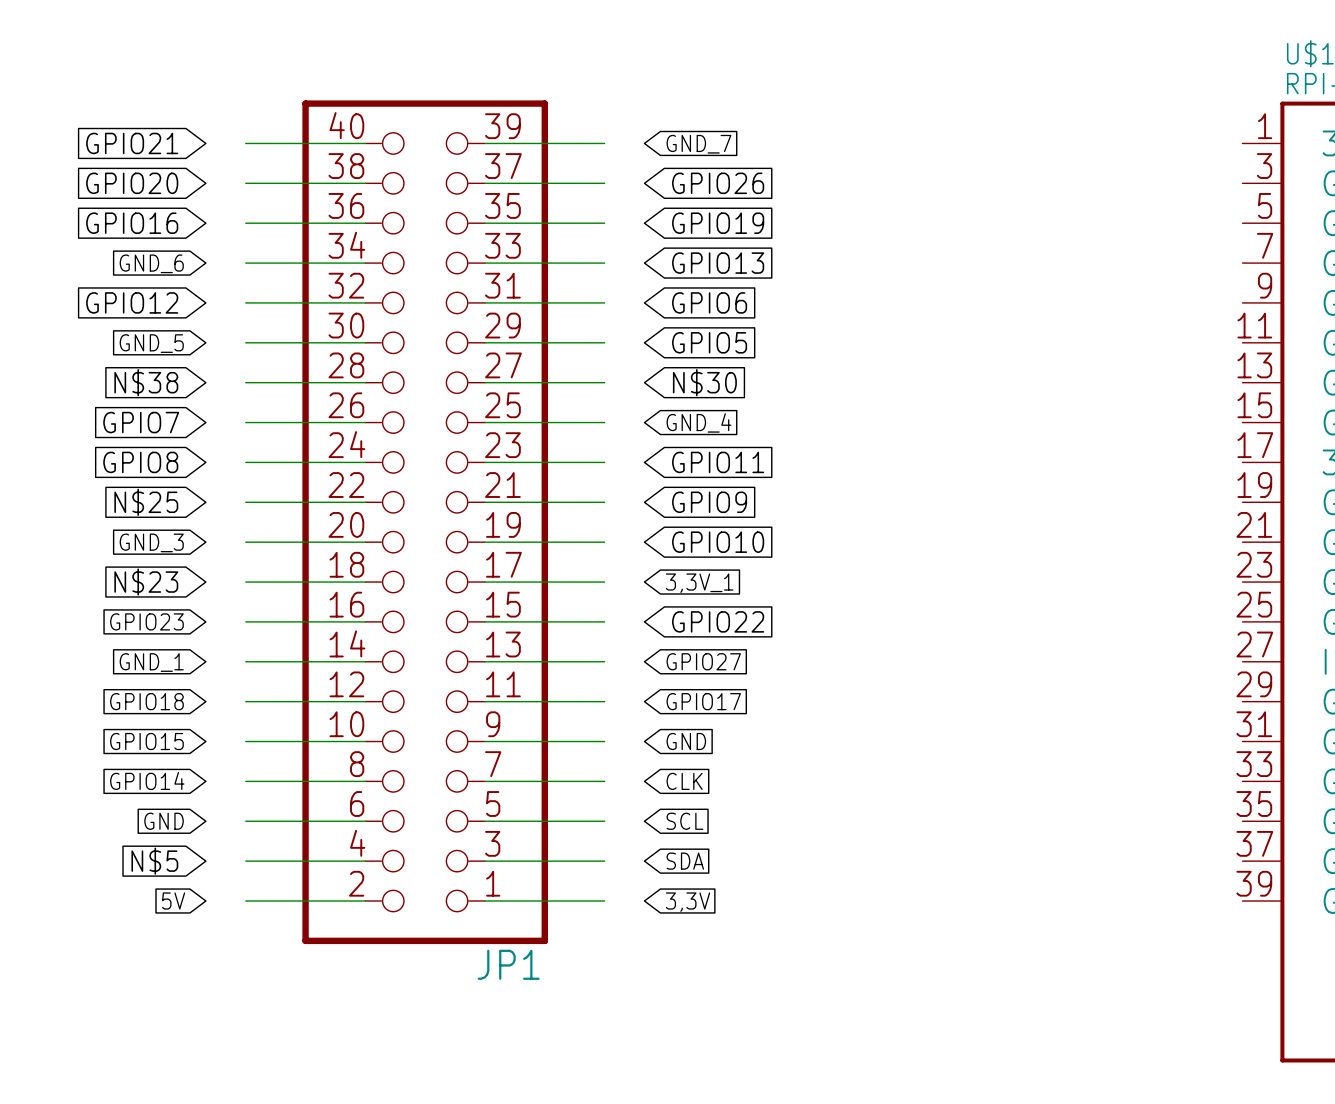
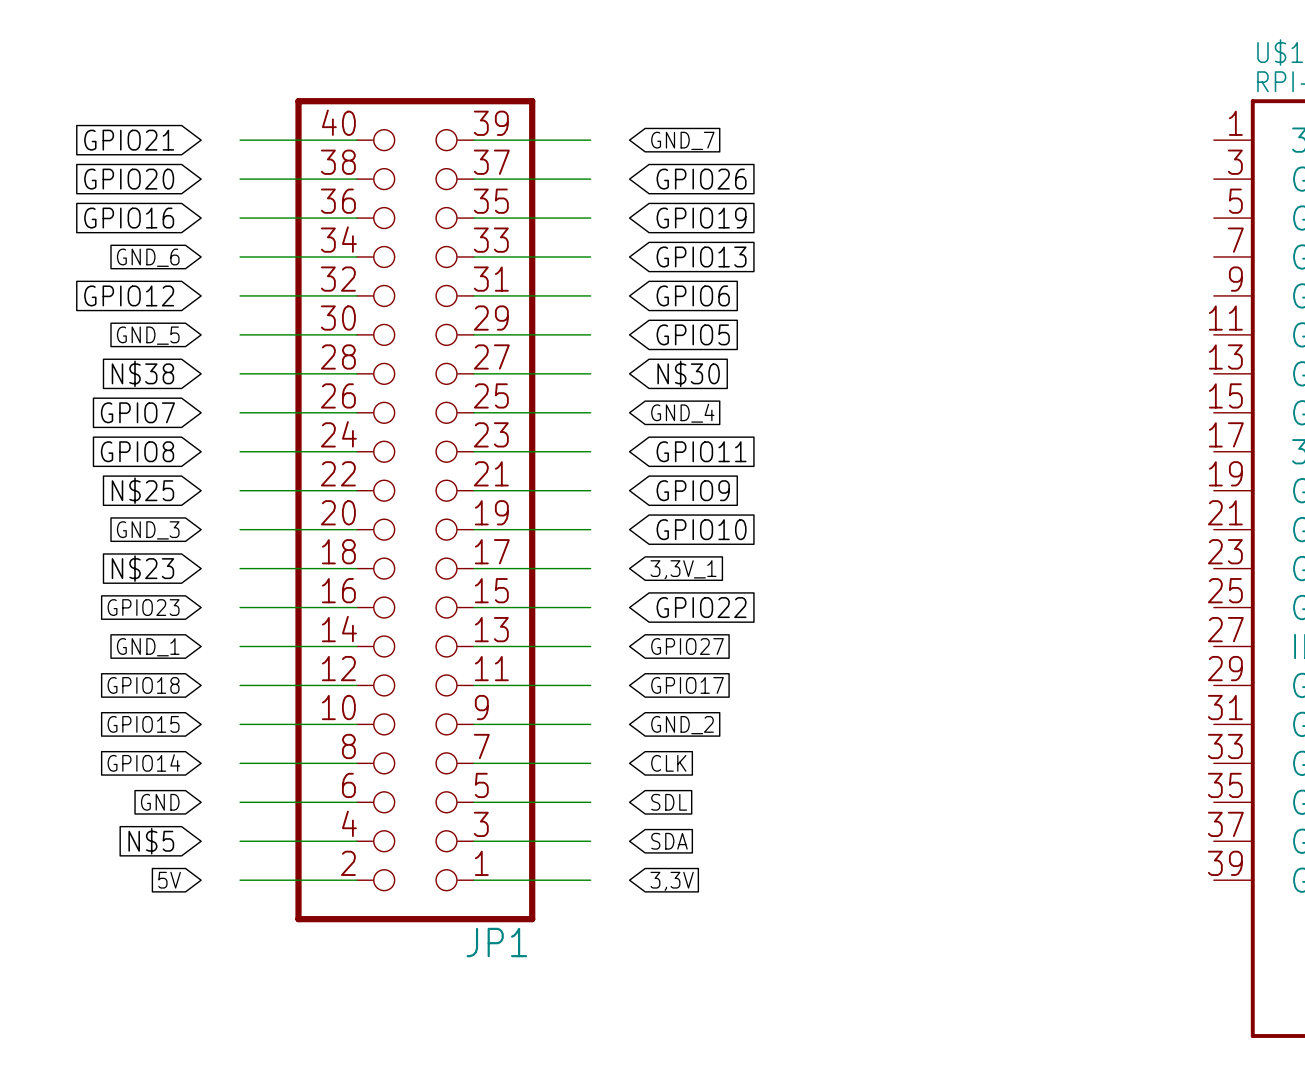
global label: GND (686, 741) -> GND_2 (682, 725)
global label: SCL (684, 821) -> SDL (669, 802)

